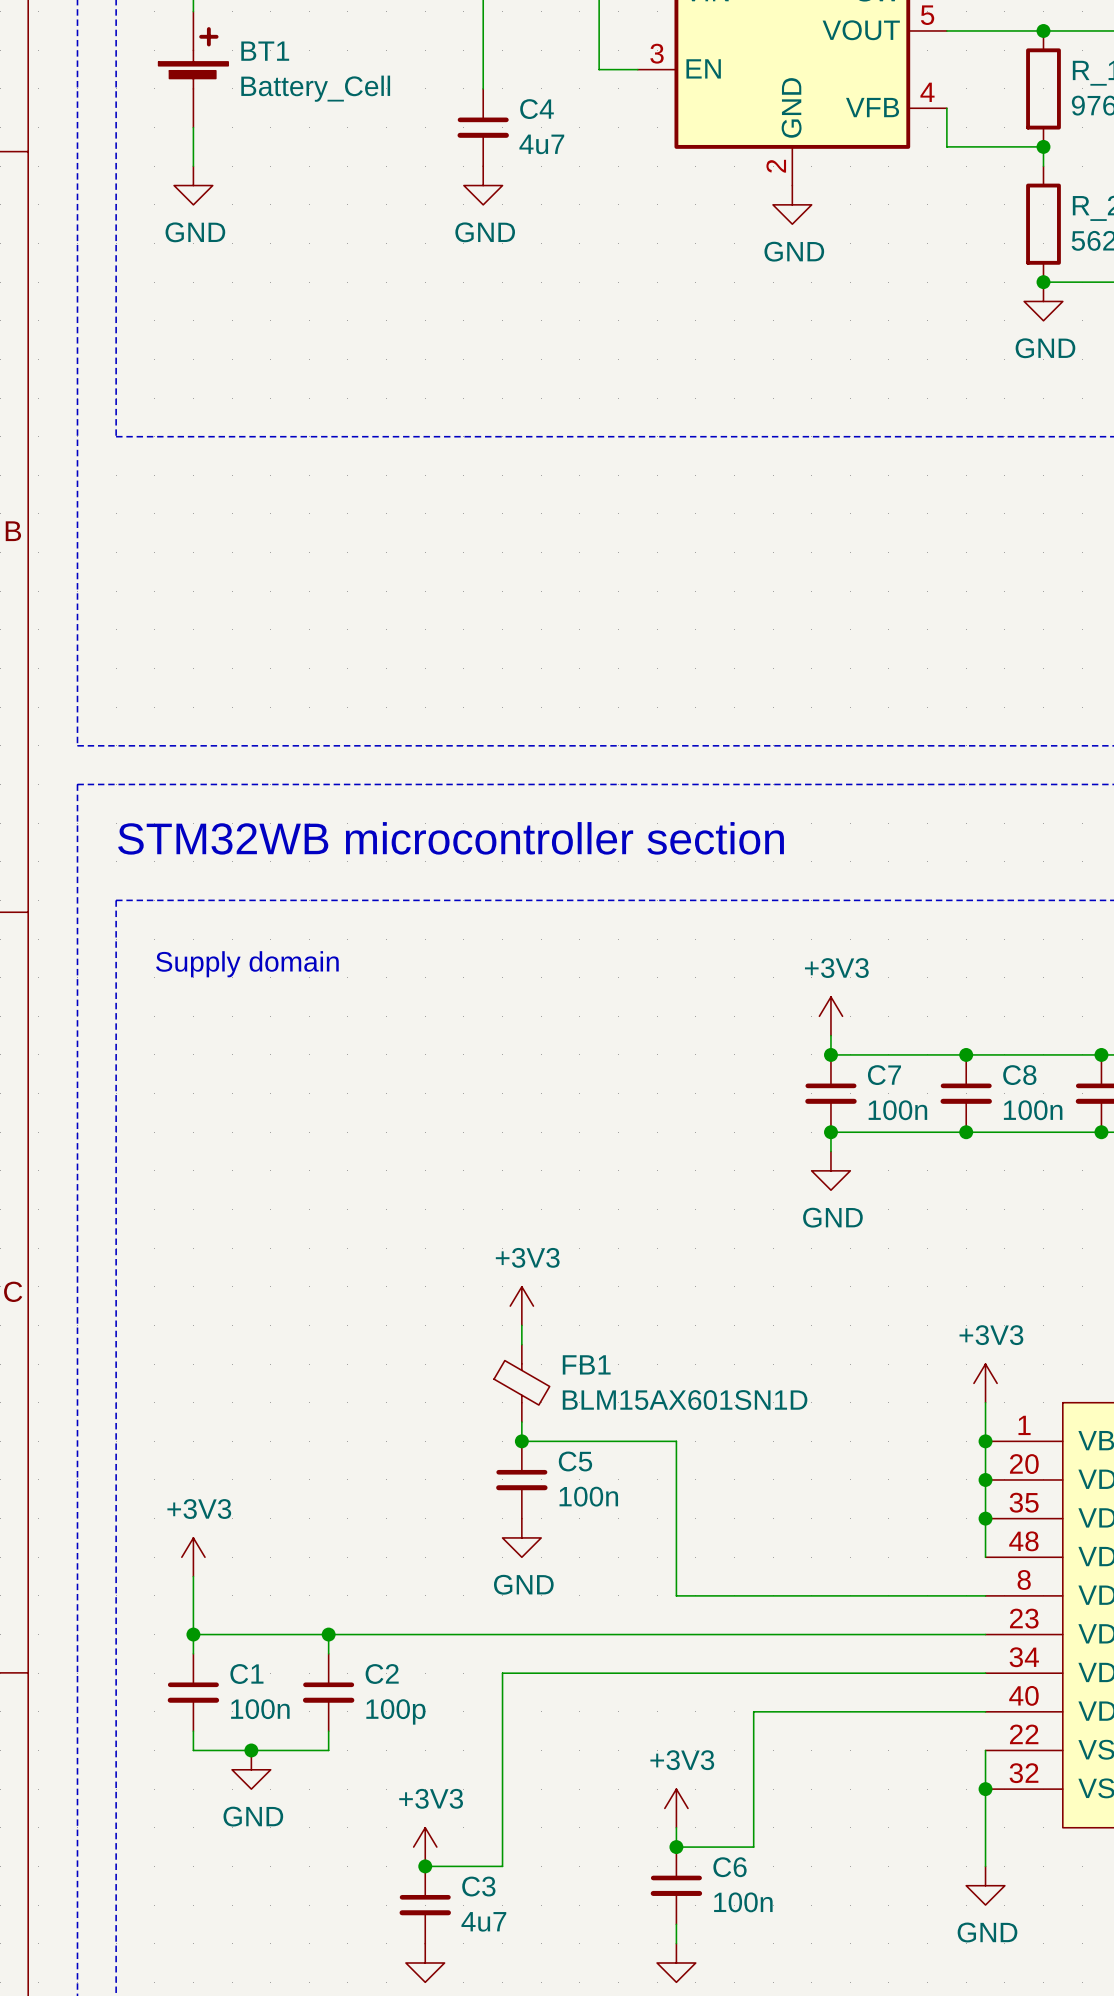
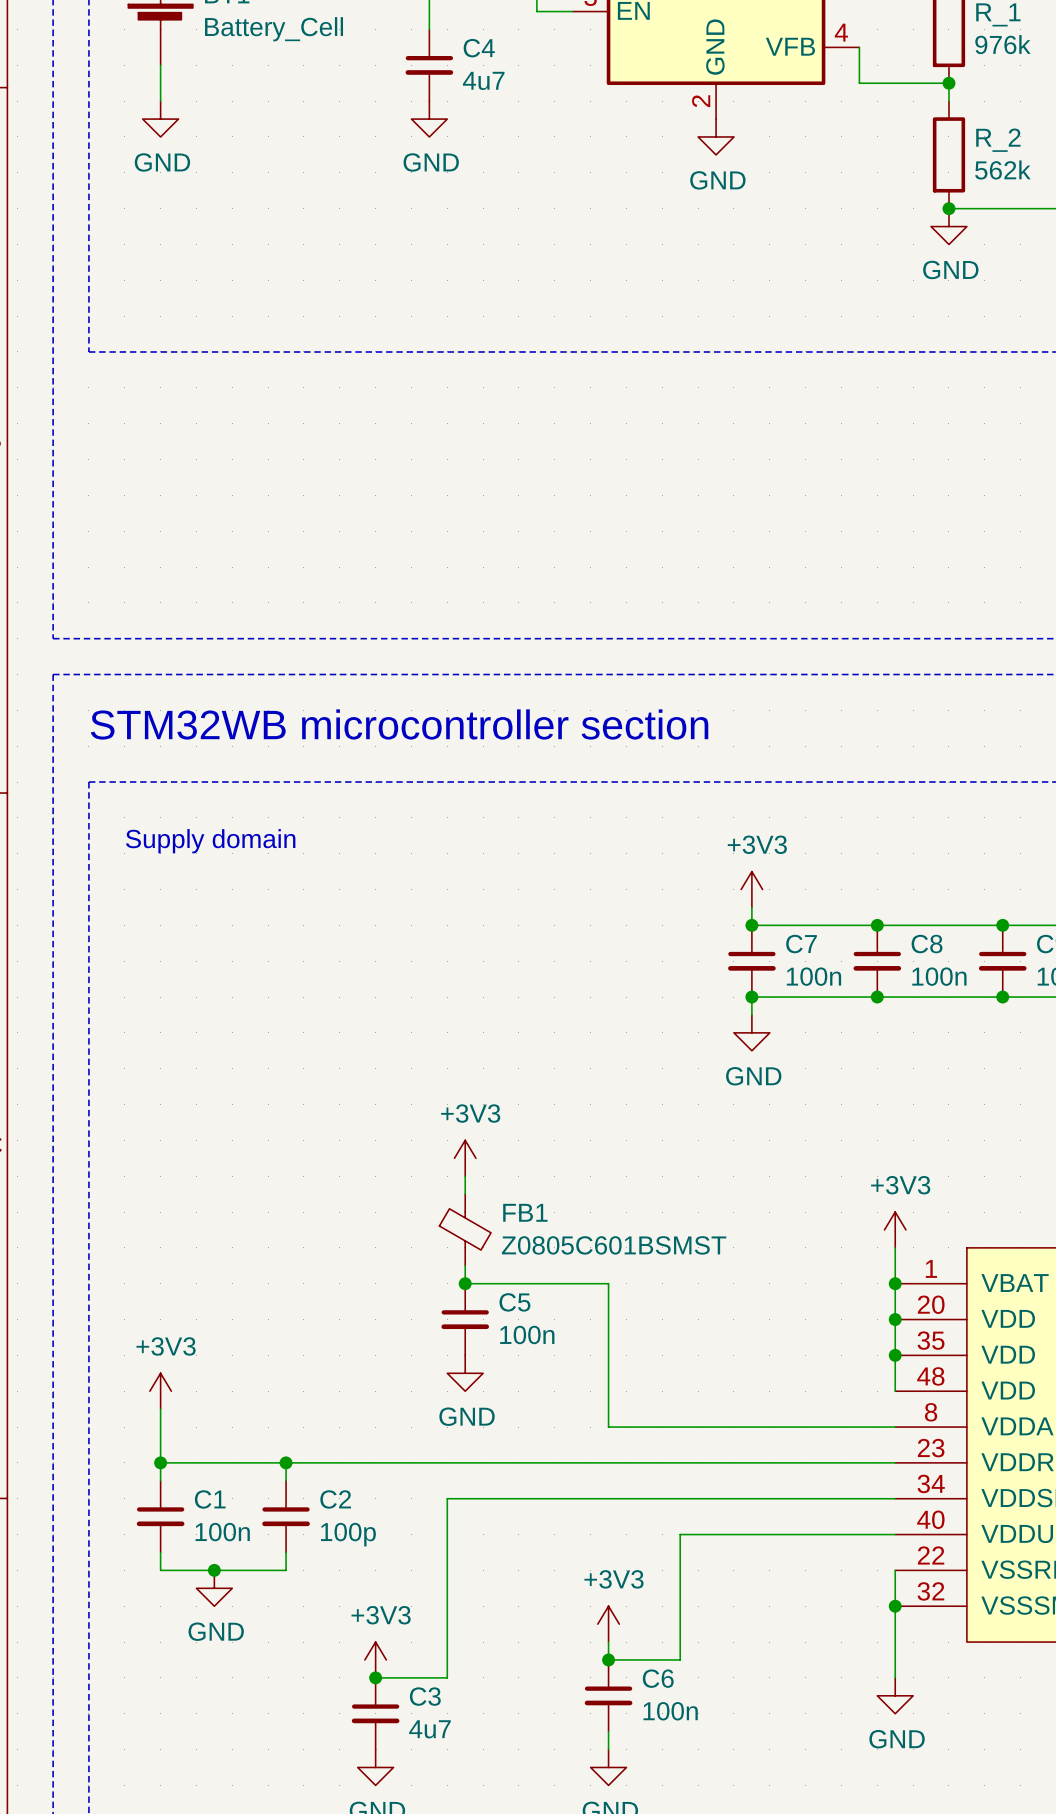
FB1 value: BLM15AX601SN1D (685, 1400) -> Z0805C601BSMST (614, 1245)

